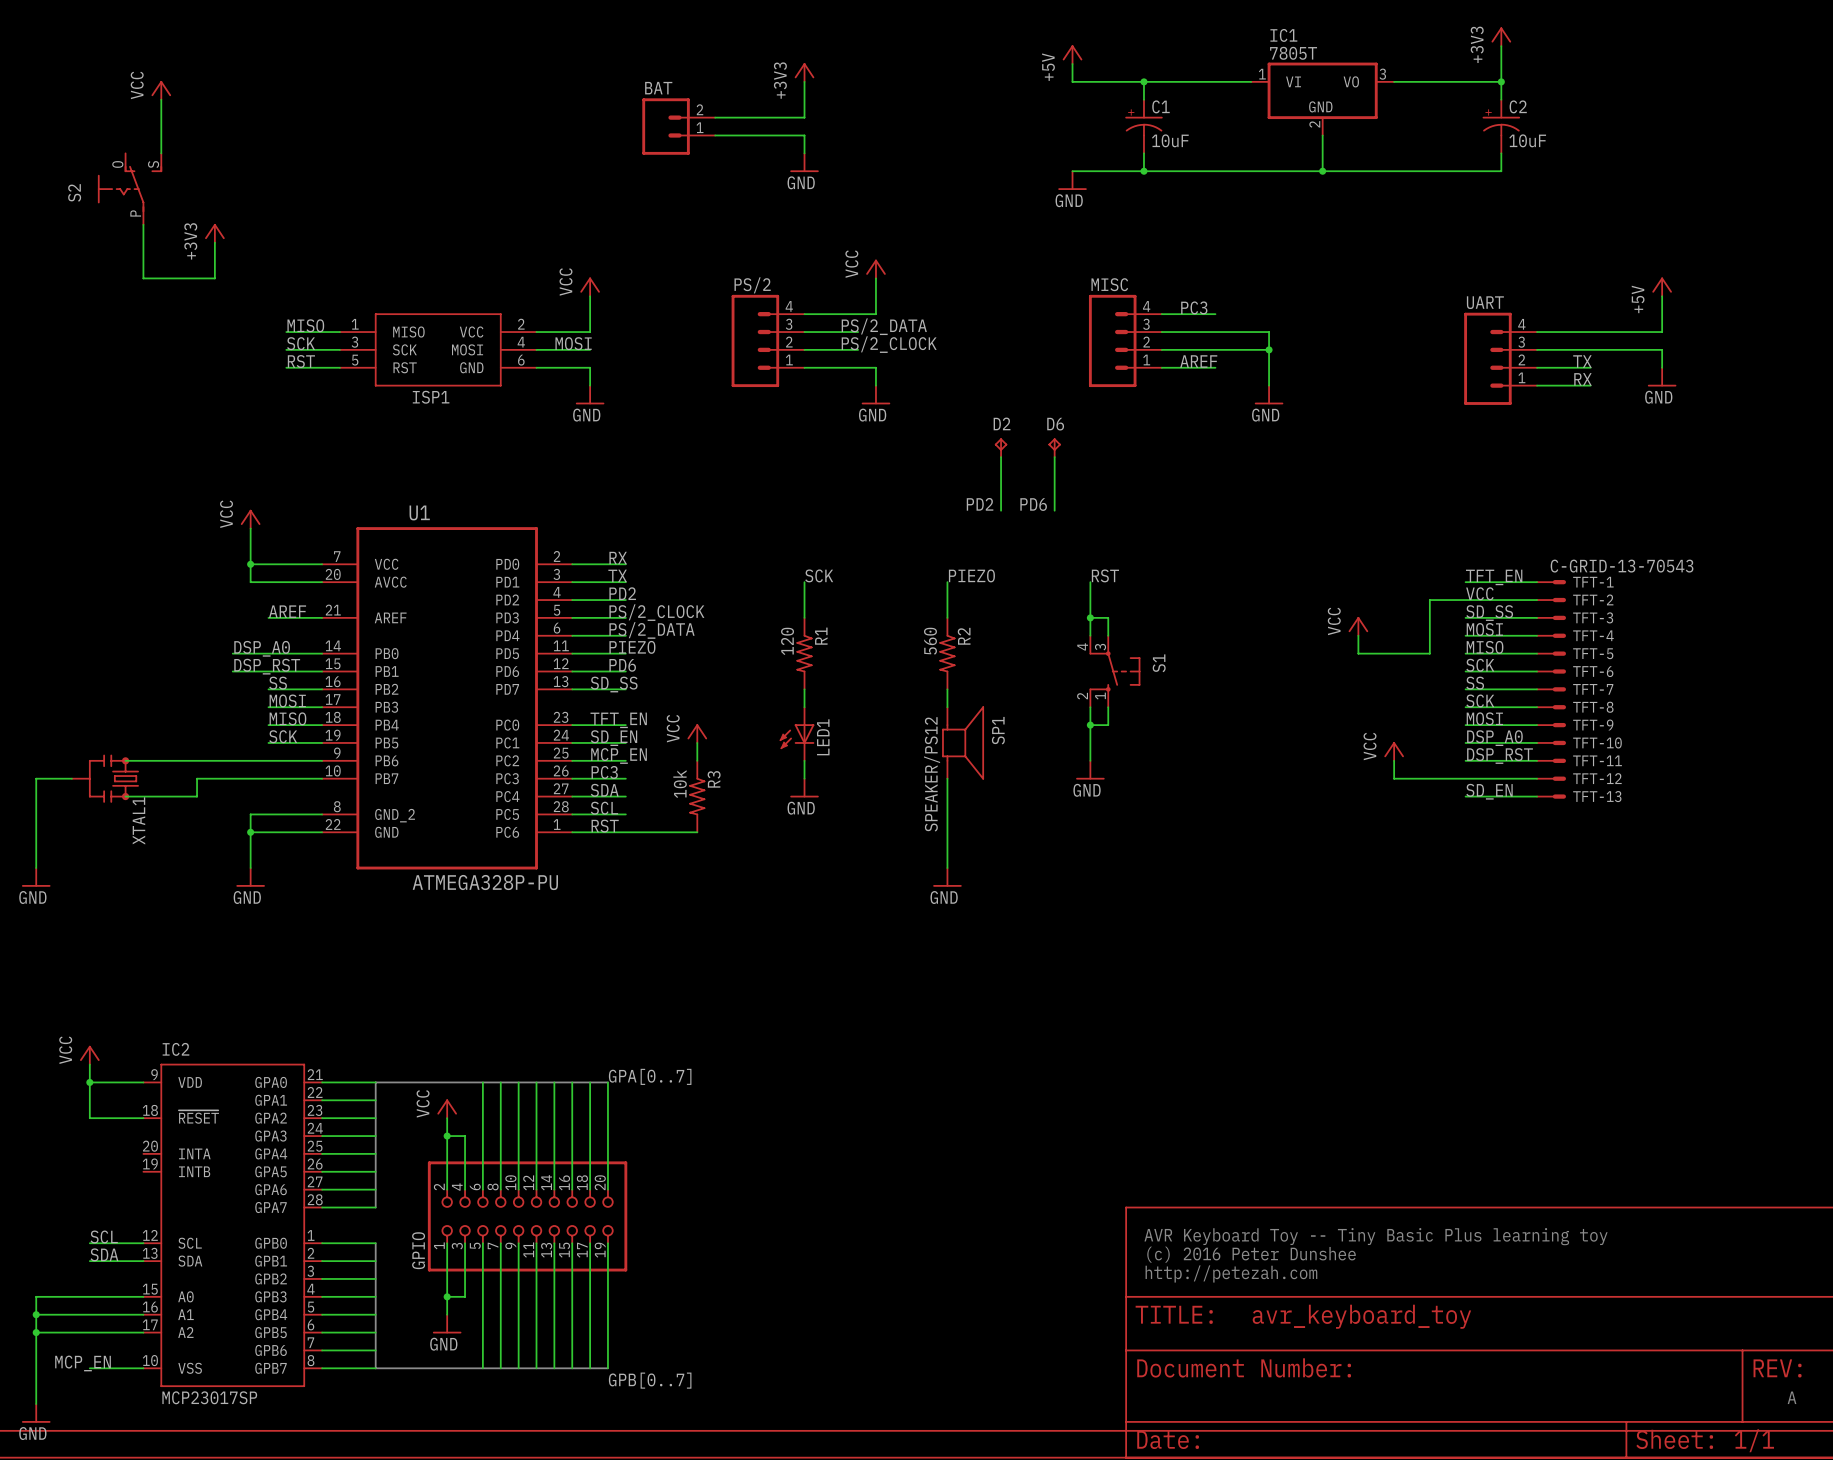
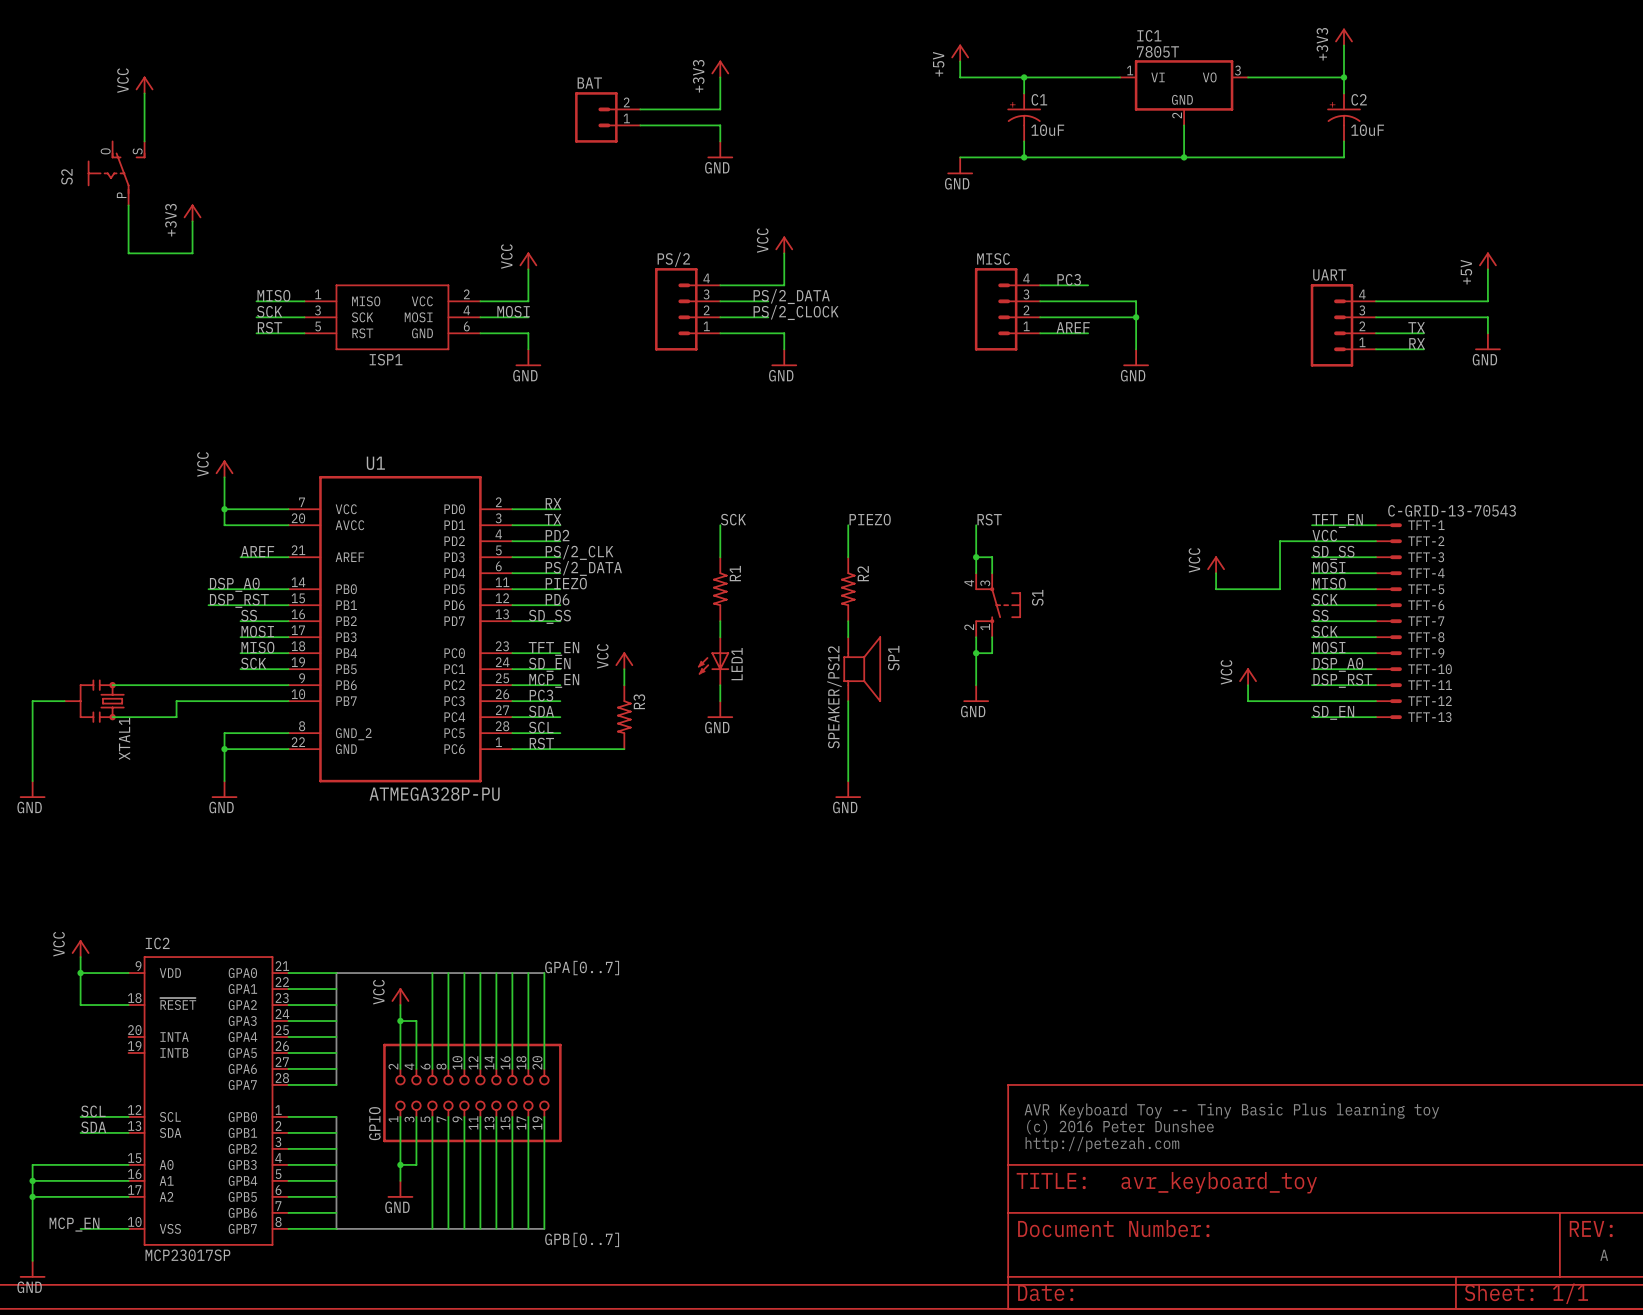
D2: (1001, 447) -> none
D6: (1054, 447) -> none
wire: (1001, 457) (1001, 510) -> none
wire: (1054, 457) (1054, 510) -> none
label: PD2 (980, 504) -> none
label: PD6 (1033, 504) -> none
label: PS/2_CLOCK (656, 612) -> PS/2_CLK (579, 552)
R1 value: 120 (787, 641) -> none
R2 value: 560 (930, 641) -> none
R3 value: 10k (680, 784) -> none

